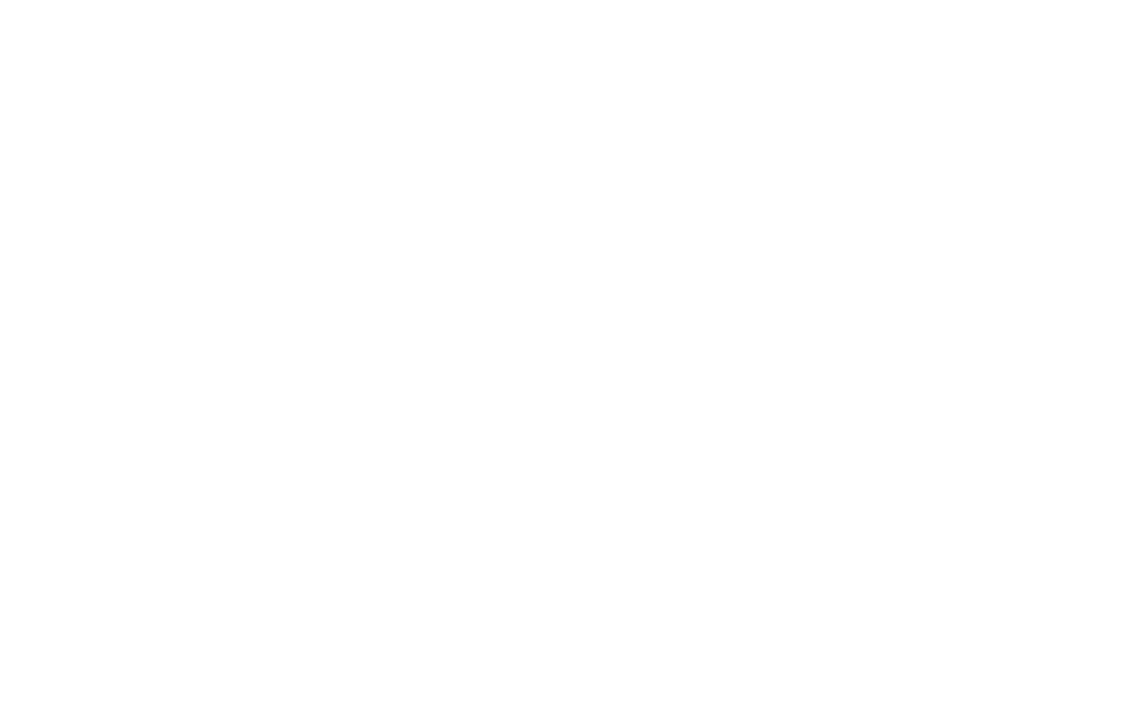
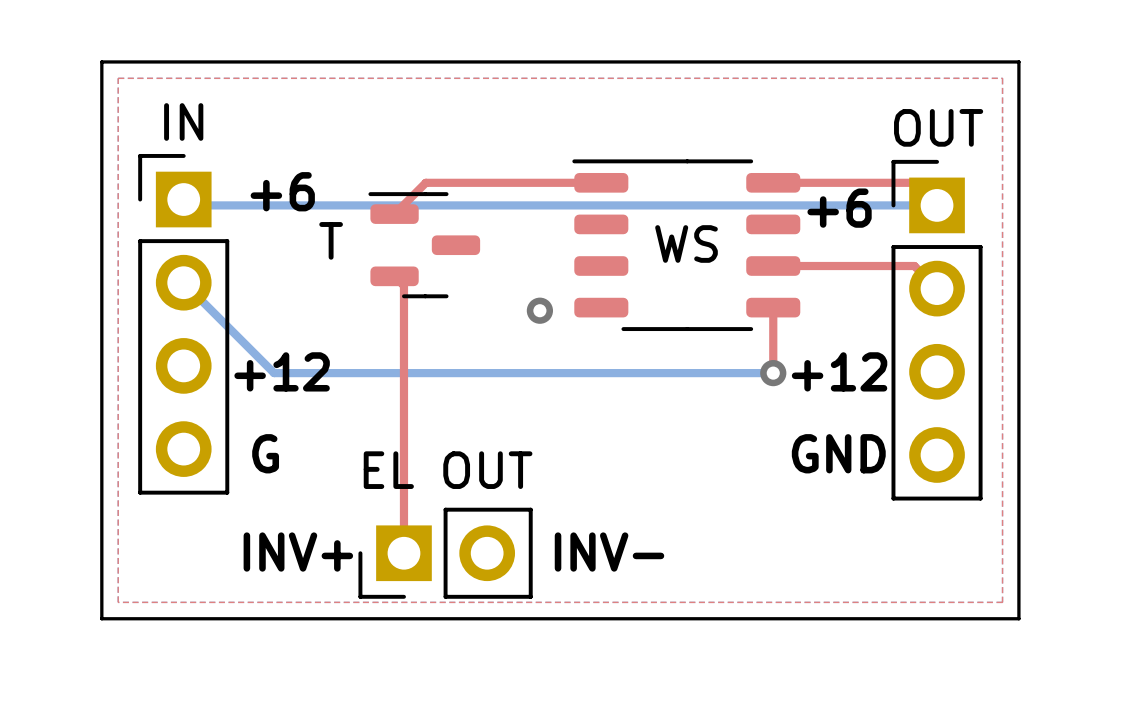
board edge: none -> (101, 61) (1018, 61) (1018, 618) (101, 618) (101, 61)
top zone outline: none -> (118, 78) (118, 602) (1002, 602) (1002, 78) (118, 78)
top track: none -> (601, 182) (425, 182) (394, 214)
top track: none -> (773, 182) (914, 182) (937, 205)
text: none -> +6 (282, 191)
bottom track: none -> (183, 199) (189, 205) (937, 205)
text: none -> +6 (839, 208)
T: none -> (424, 245)
WS: none -> (686, 245)
top track: none -> (773, 266) (914, 266) (937, 288)
top track: none -> (394, 276) (403, 285) (403, 553)
bottom track: none -> (183, 282) (274, 373) (773, 373)
top track: none -> (773, 307) (773, 373)
via: none -> (539, 310)
IN: none -> (183, 324)
OUT: none -> (937, 330)
text: none -> +12 (282, 371)
text: none -> +12 (839, 371)
via: none -> (773, 373)
text: none -> G (265, 453)
text: none -> GND (838, 453)
text: none -> INV+ (298, 552)
text: none -> INV- (609, 552)
EL OUT: none -> (445, 553)

